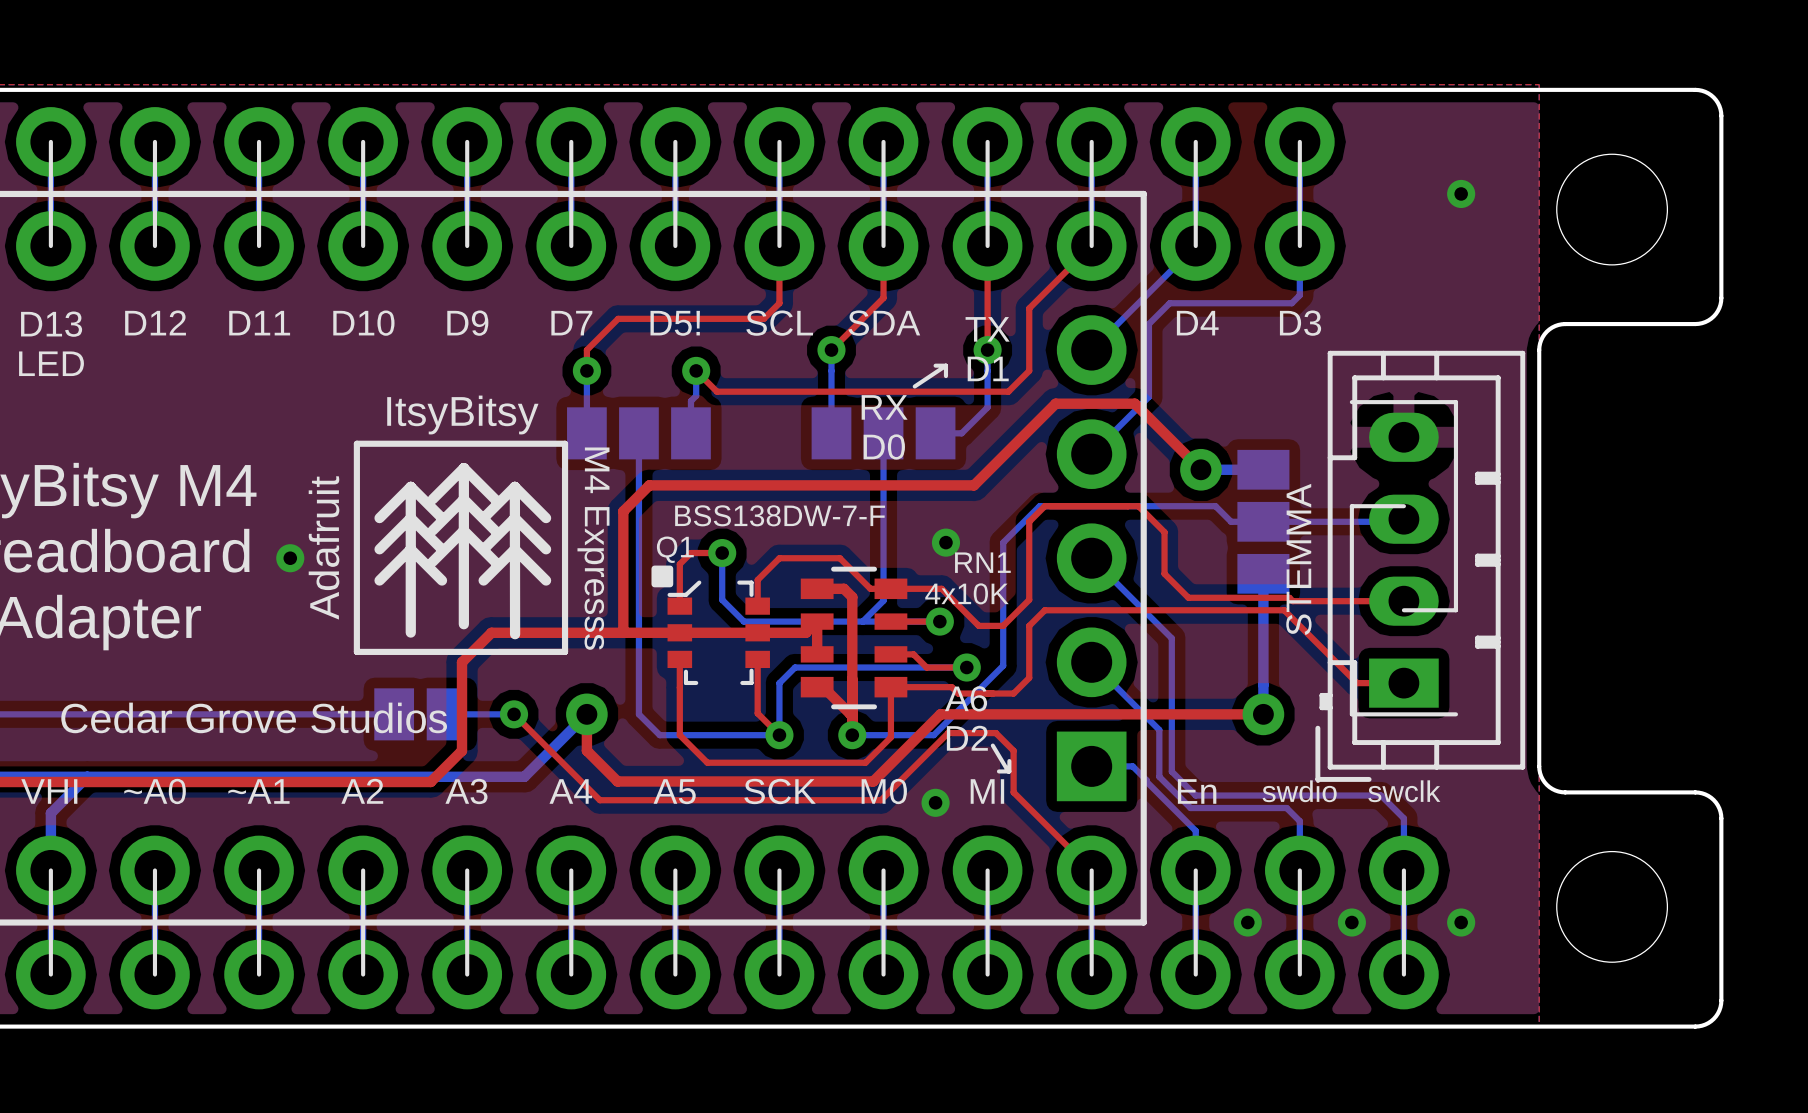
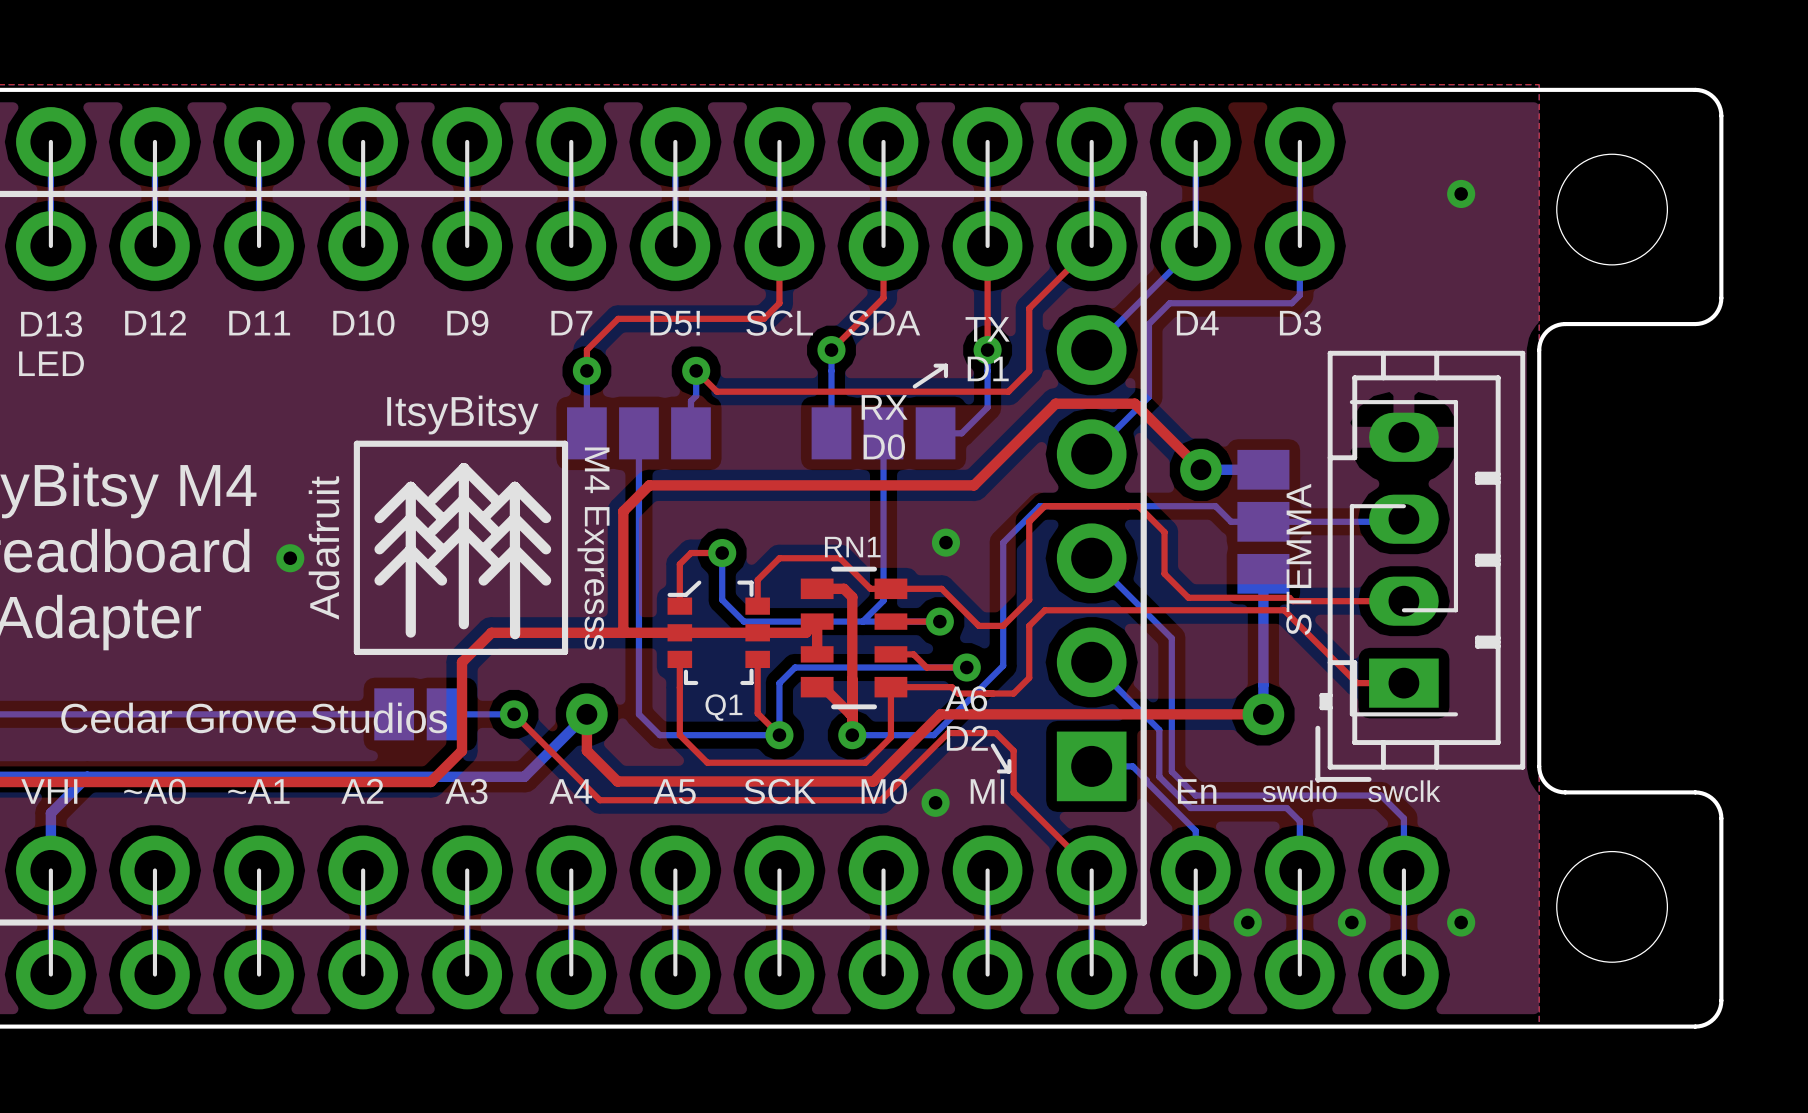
Q1 value: BSS138DW-7-F (780, 515) -> none
Q1 name position: Q1 (675, 549) -> Q1 (723, 707)
RN1 name position: RN1 (982, 562) -> RN1 (852, 547)
drawing: [651, 565, 674, 588] -> none
RN1 value: 4x10K (966, 593) -> none

